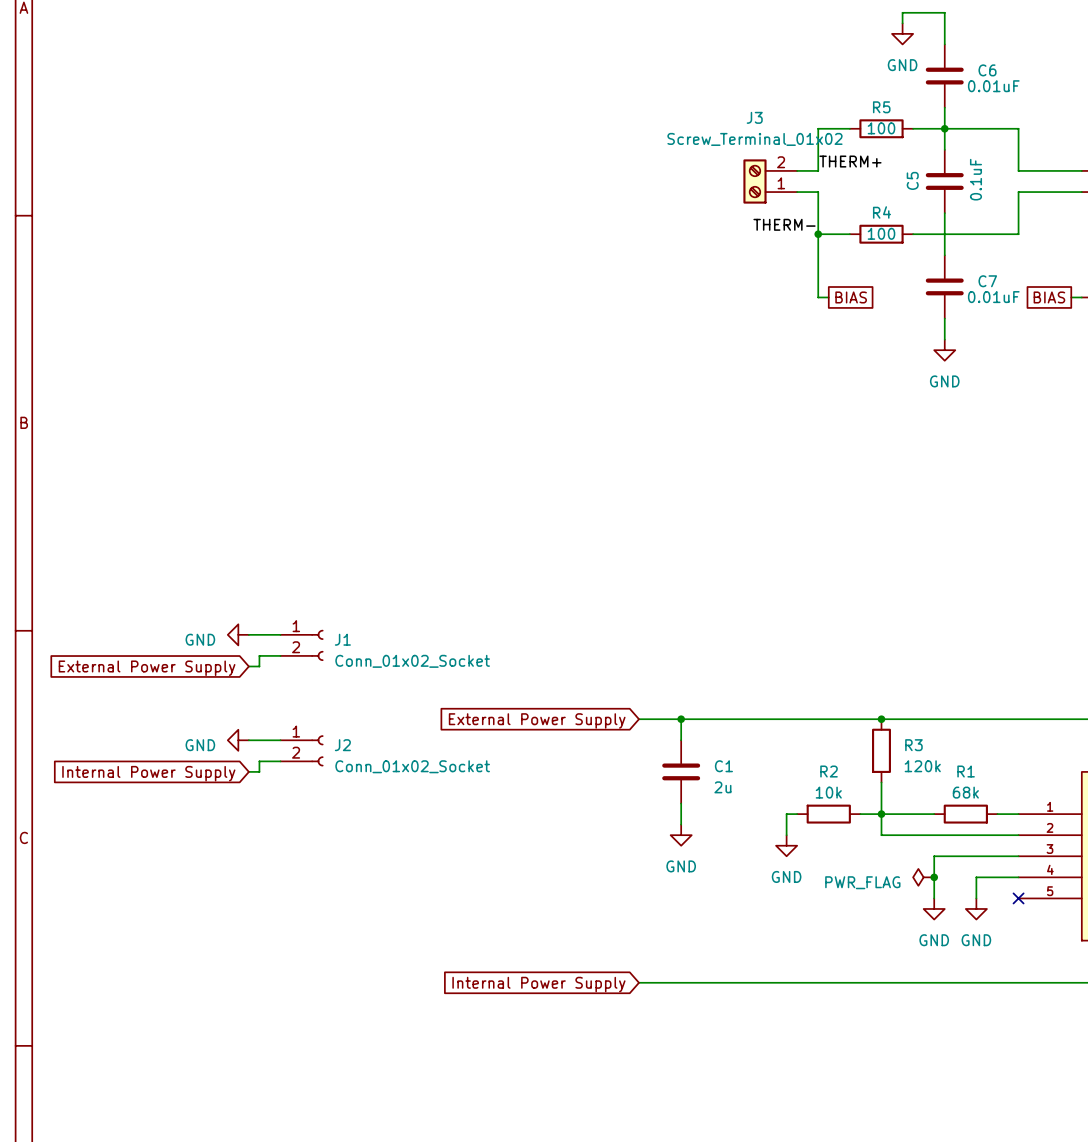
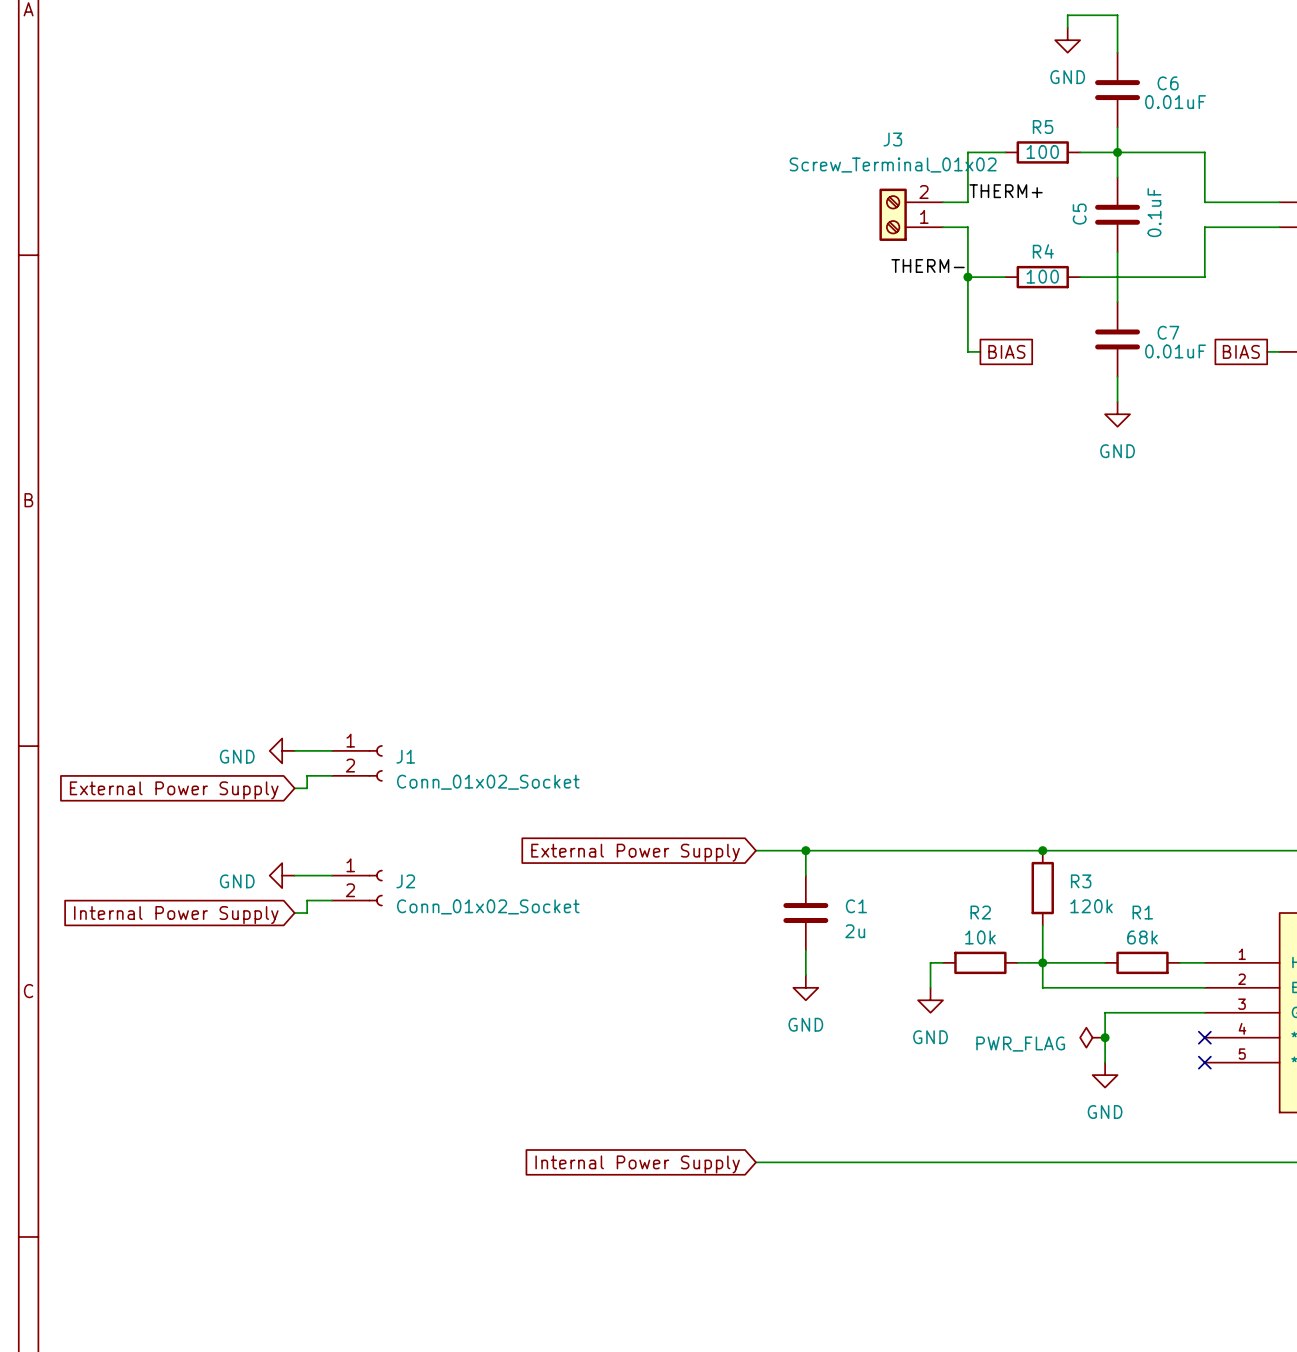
wire: (1018, 877) (976, 877) (976, 898) -> none
no-connect mark: none -> (1204, 1037)
power symbol: GND (976, 908) -> none

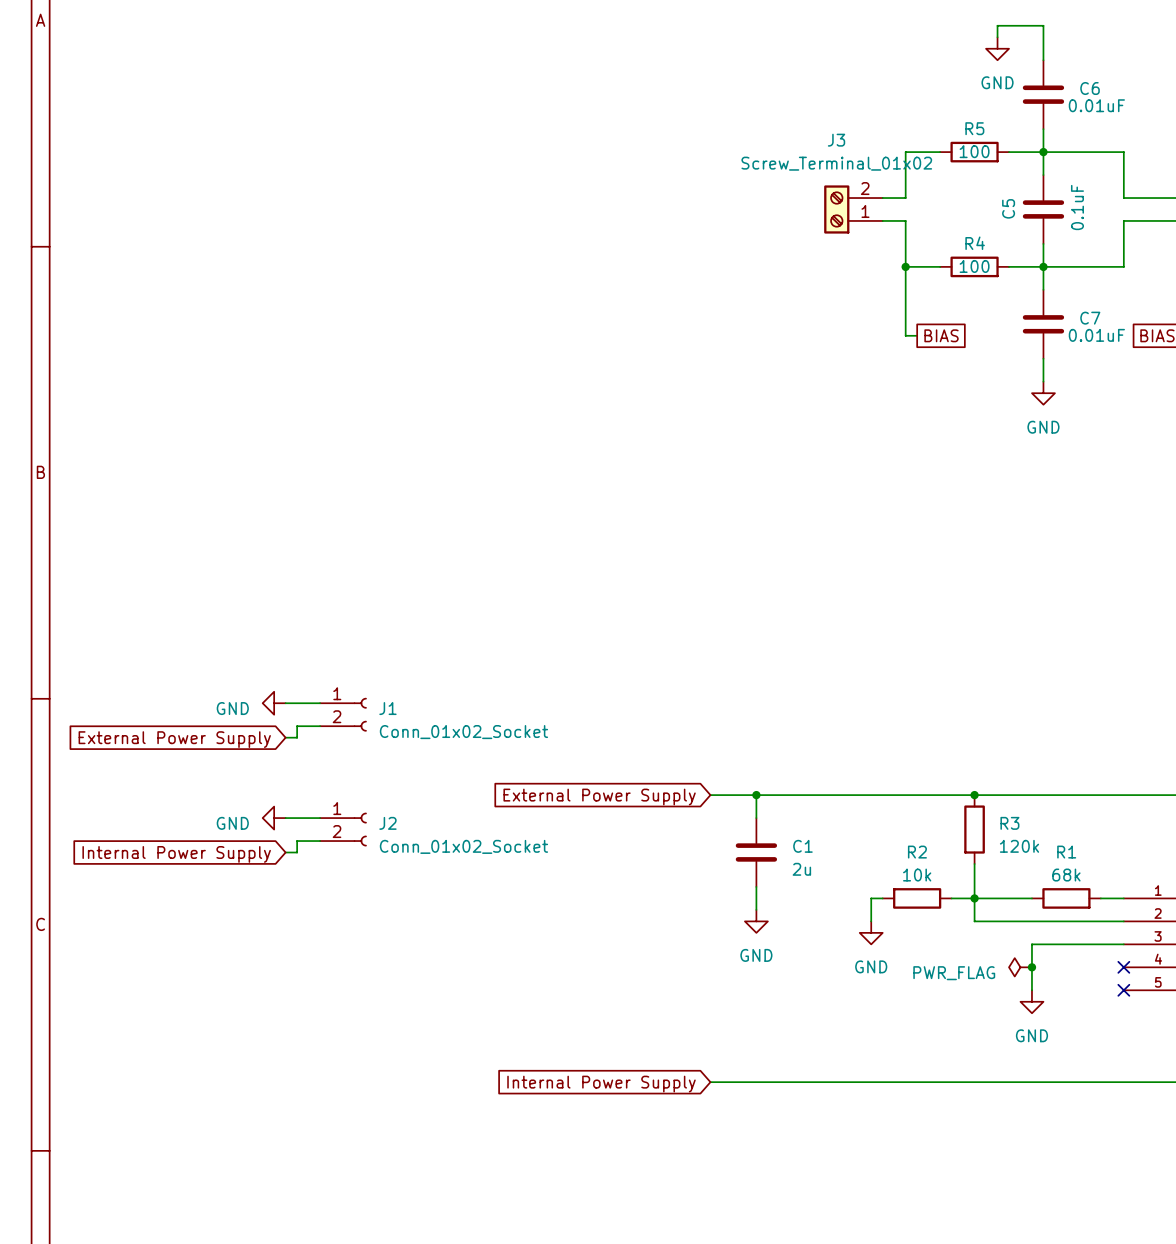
label: THERM+ (1006, 191) -> none
label: THERM- (928, 265) -> none
junction: none -> (1043, 266)

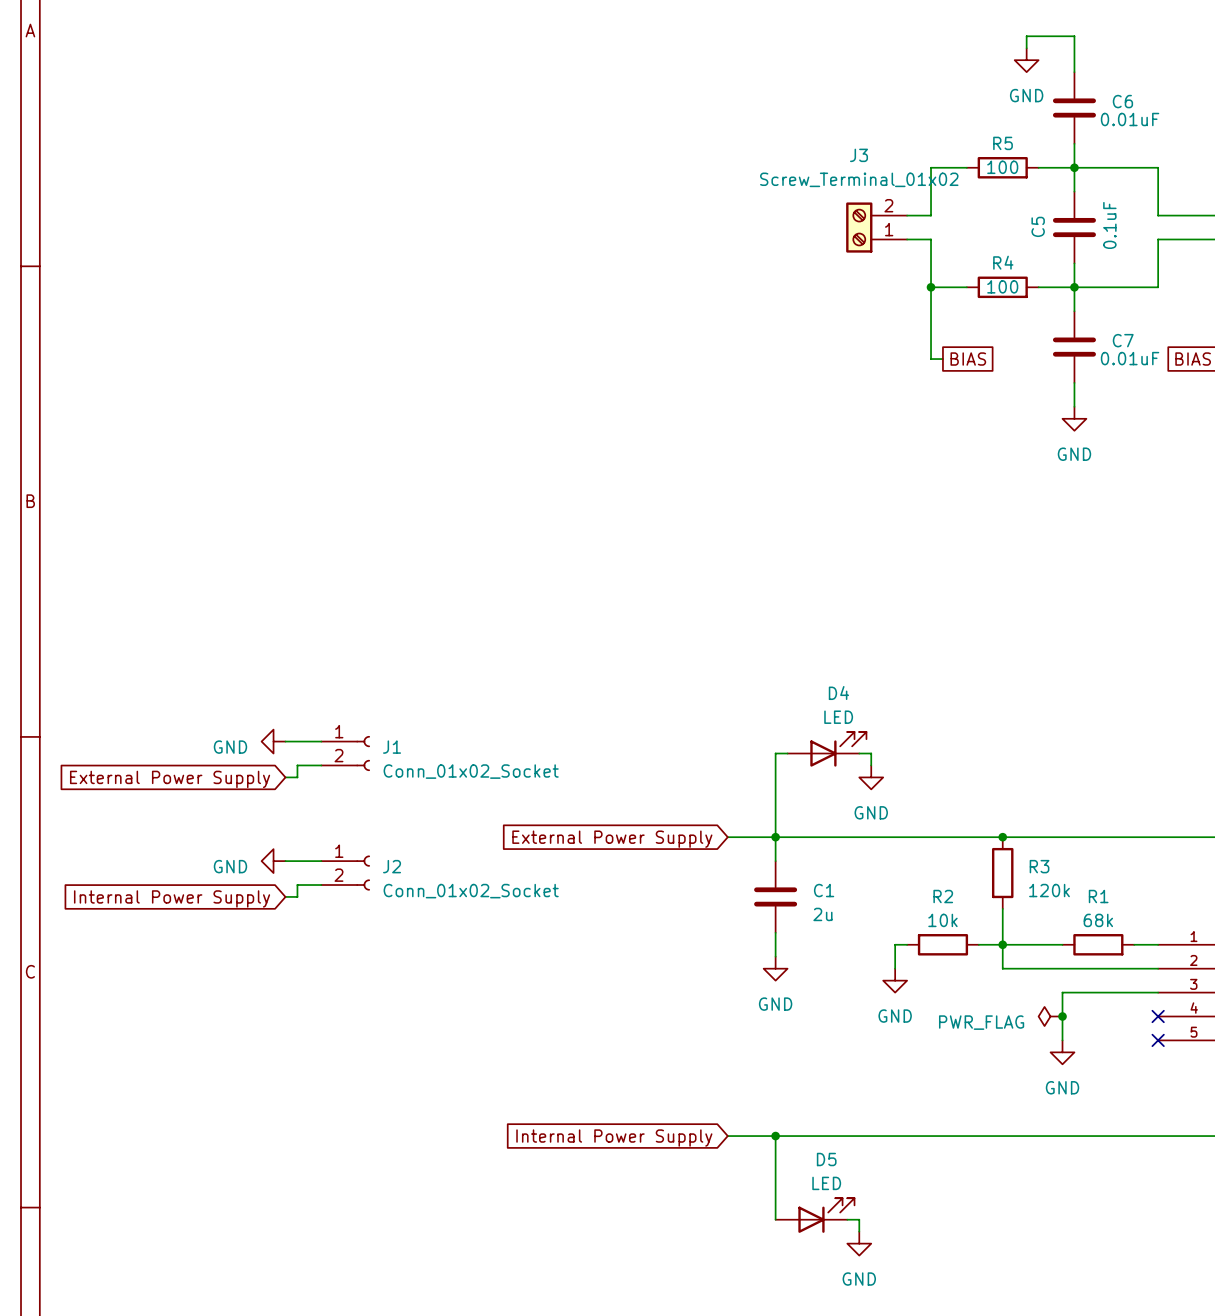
D4: none -> LED (827, 749)
wire: none -> (787, 753) (775, 753) (775, 837)
wire: none -> (859, 753) (871, 753) (871, 765)
power symbol: none -> GND (871, 777)
wire: none -> (775, 1136) (775, 1219)
junction: none -> (775, 1136)
D5: none -> LED (815, 1215)
wire: none -> (847, 1219) (859, 1219) (859, 1231)
power symbol: none -> GND (859, 1243)

